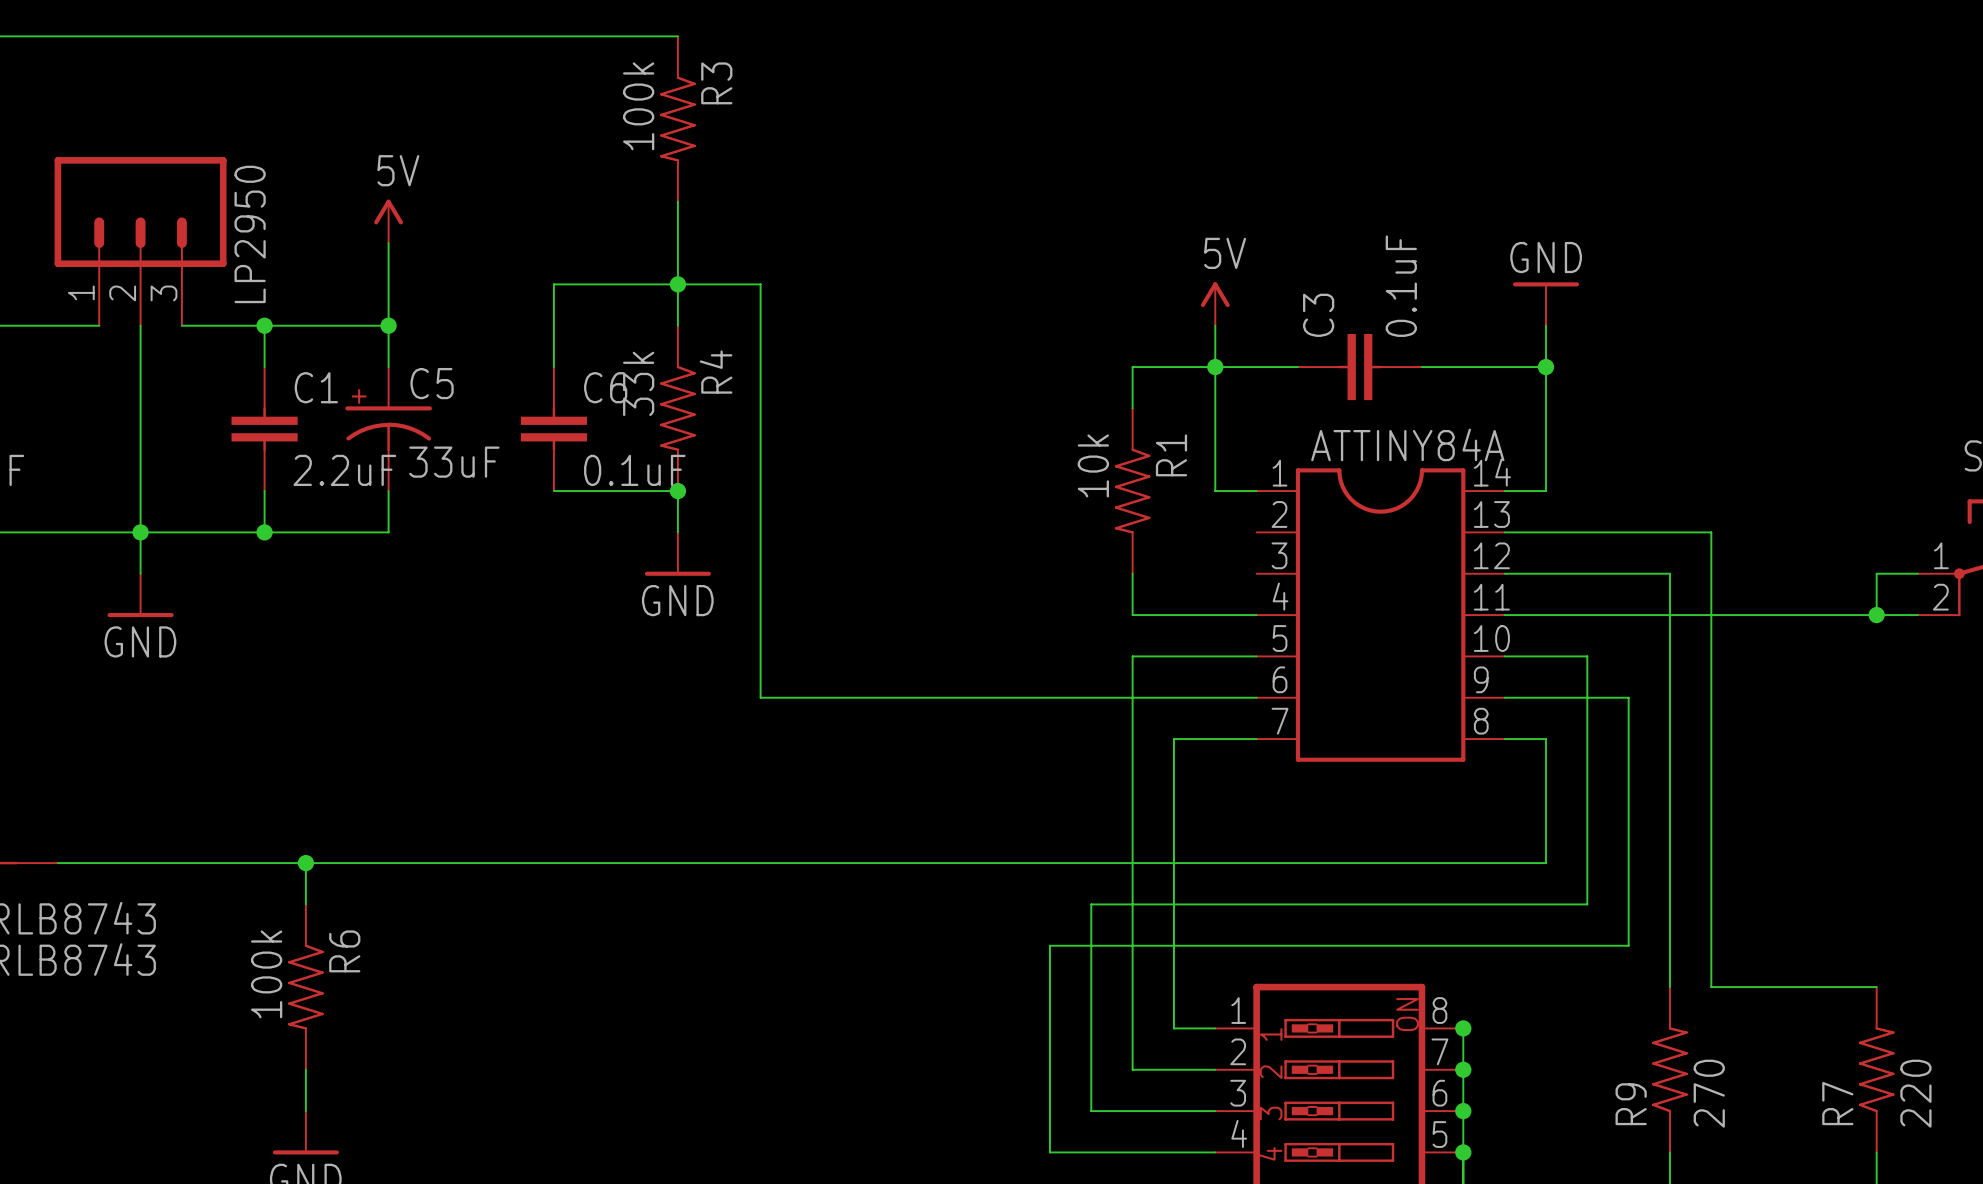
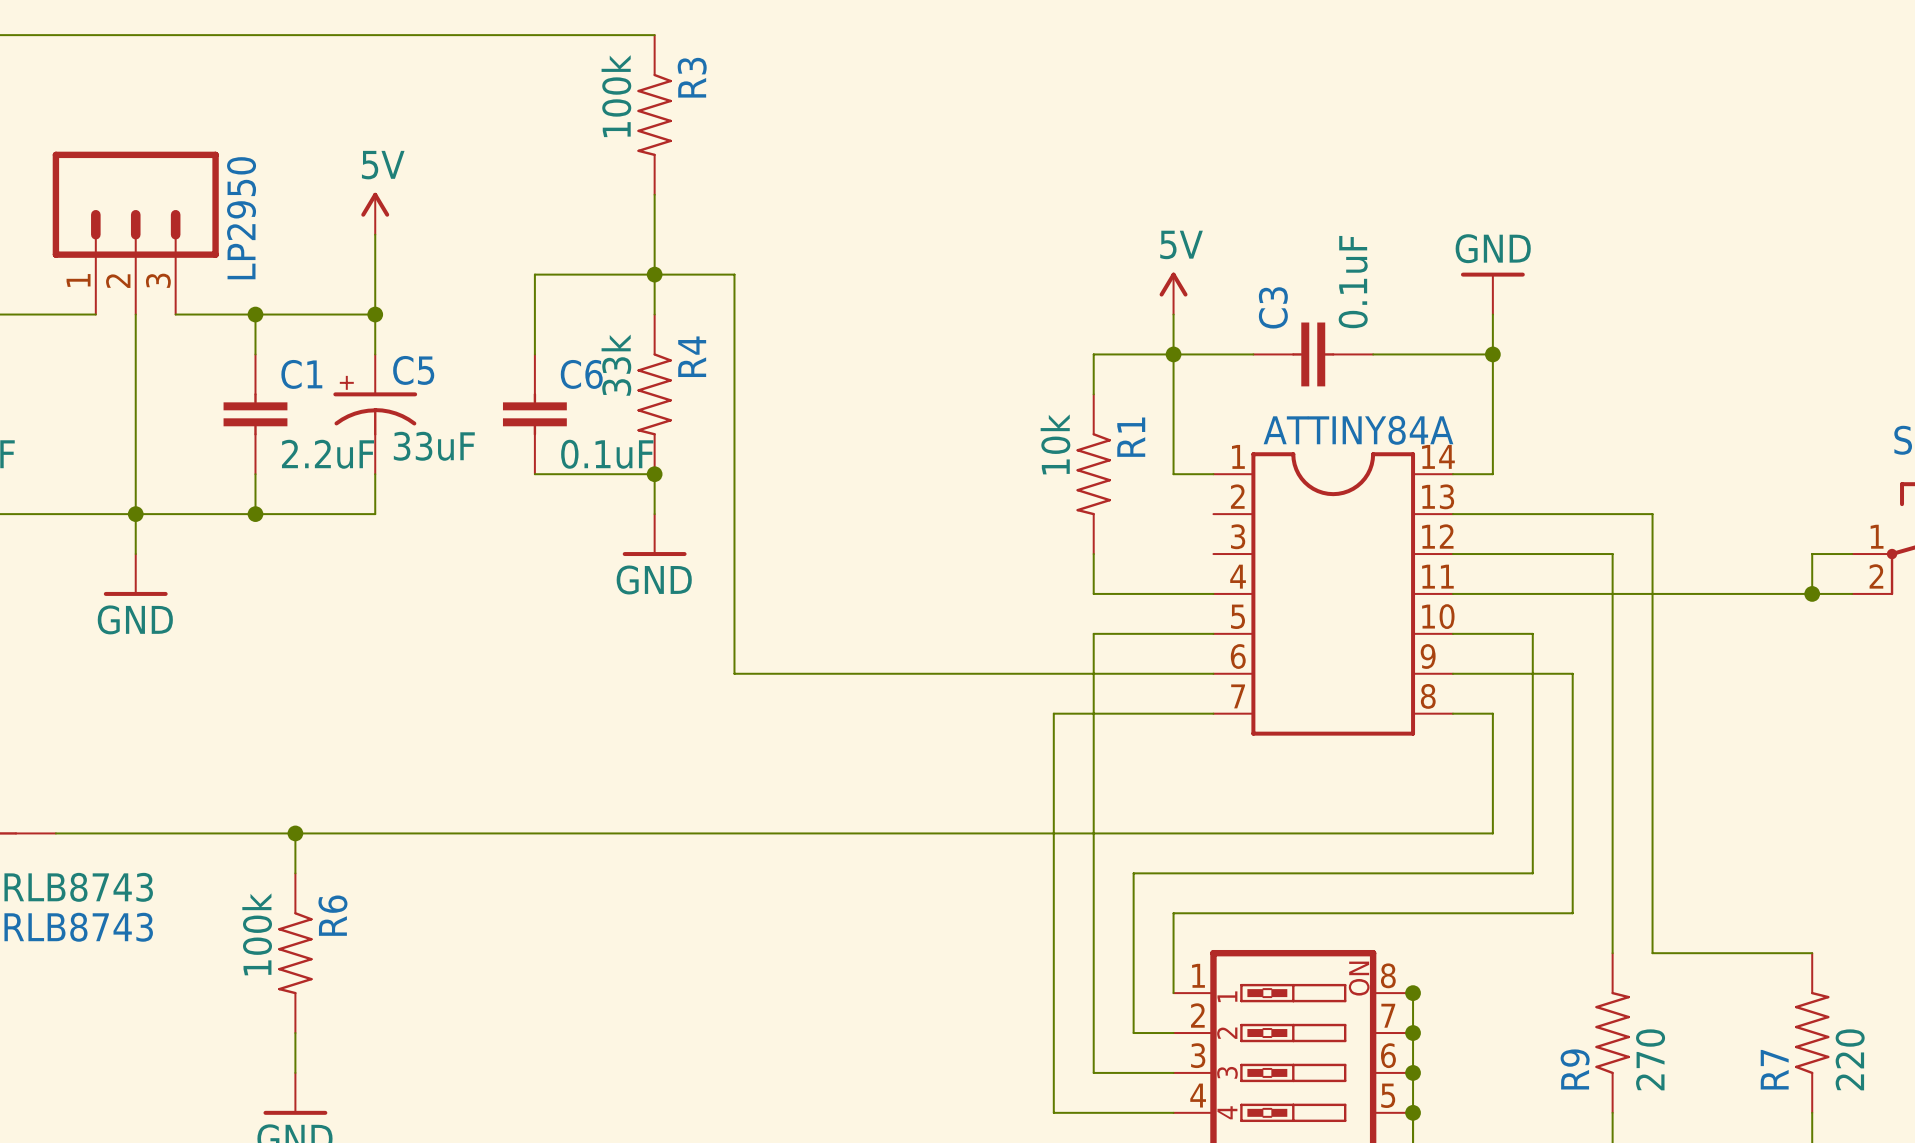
wire: (1173, 739) (1173, 904) (1091, 904) -> (1133, 713) (1053, 713) (1053, 873)
wire: (1215, 945) (1049, 945) (1049, 1152) (1091, 1152) -> (1173, 913) (1173, 993)
wire: (1173, 1028) (1215, 1028) -> (1133, 993) (1133, 1033)
wire: (1132, 1069) (1173, 1069) -> none
wire: (1091, 1111) (1132, 1111) -> (1093, 1033) (1093, 1072)
wire: none -> (1053, 1072) (1053, 1112)

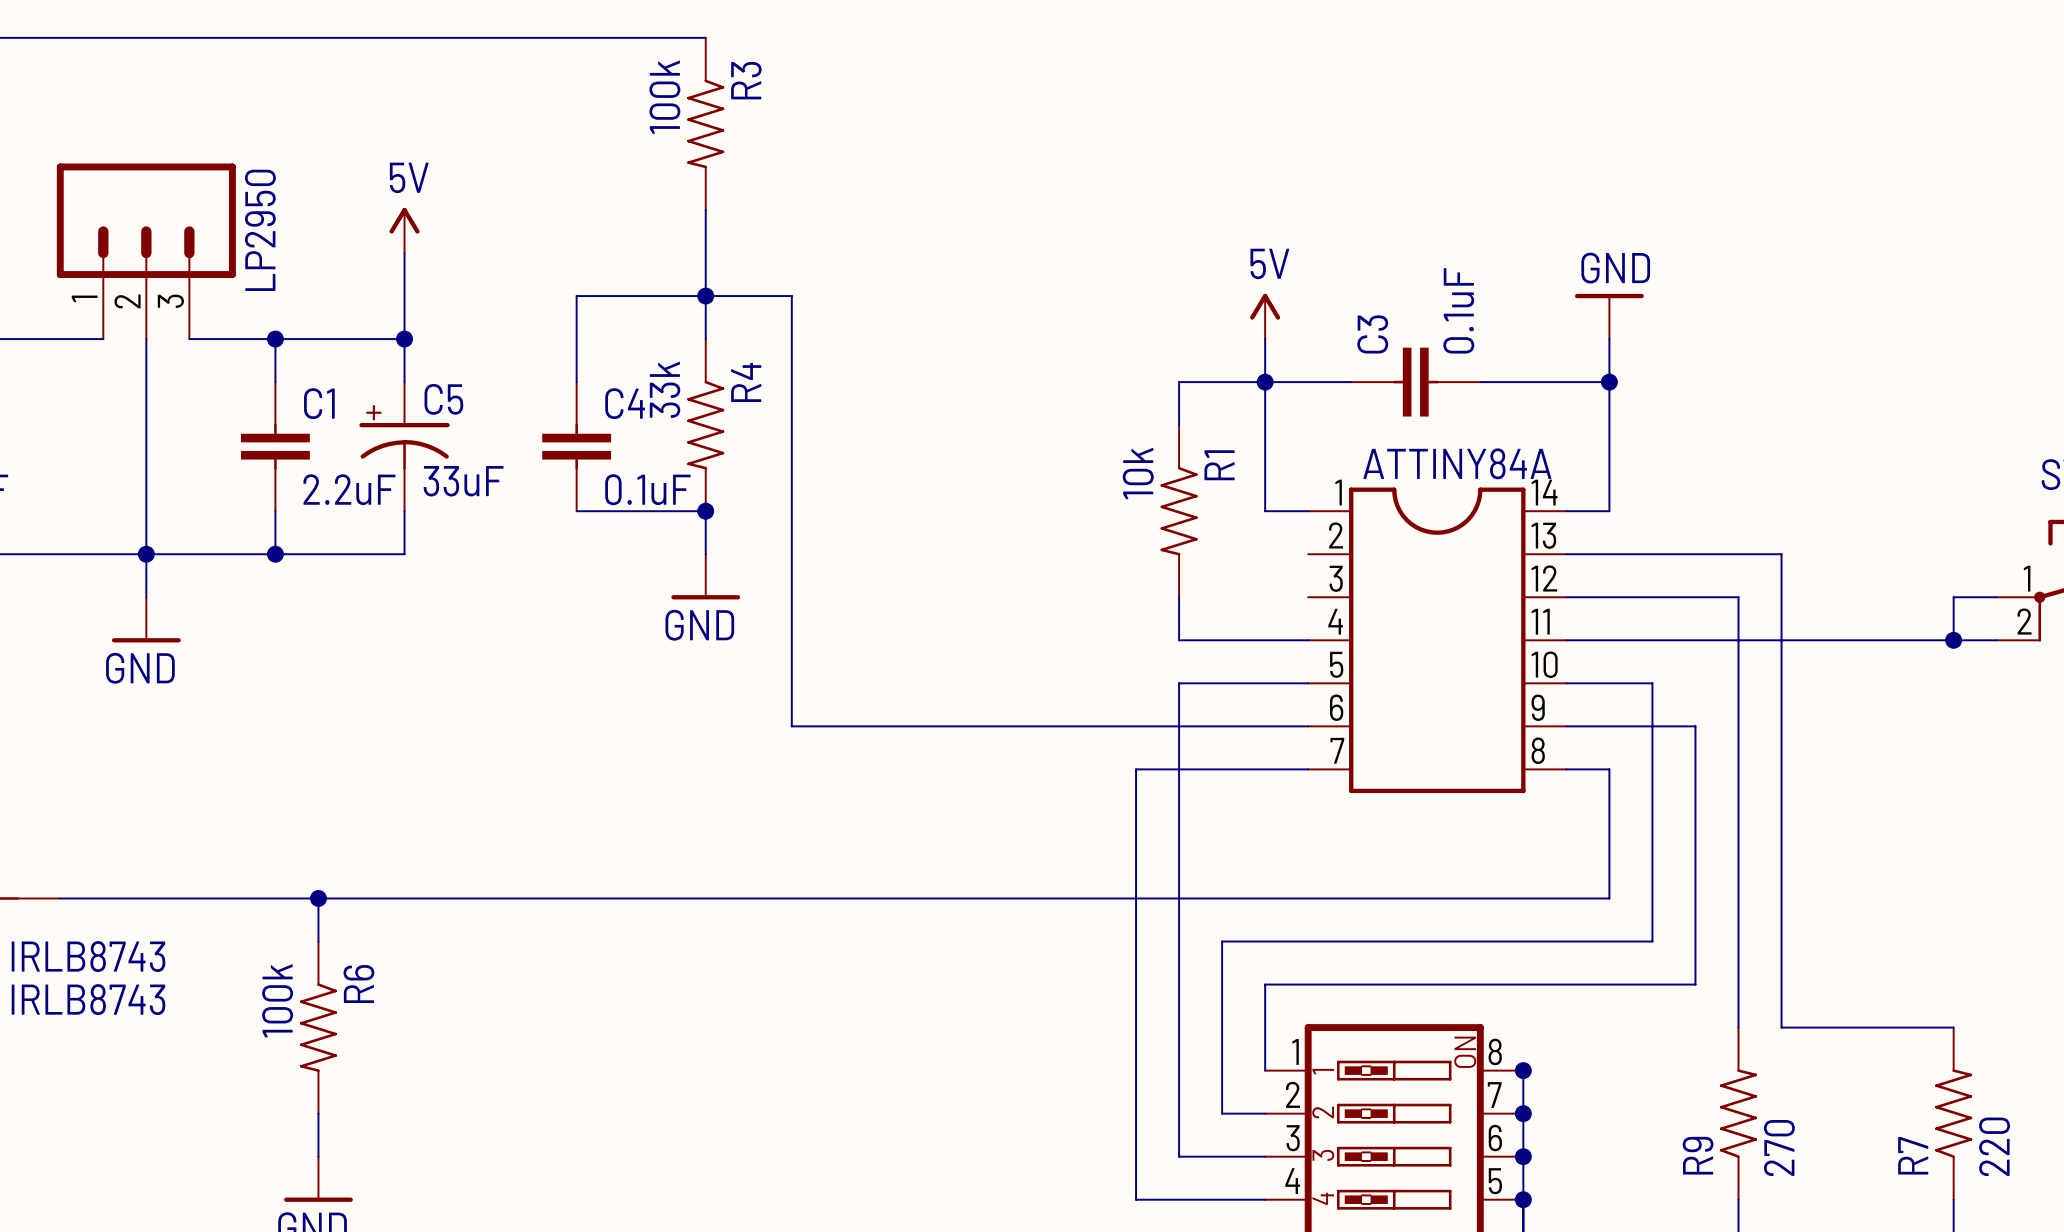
C6 name: C6 (581, 374) -> C4 (625, 403)

